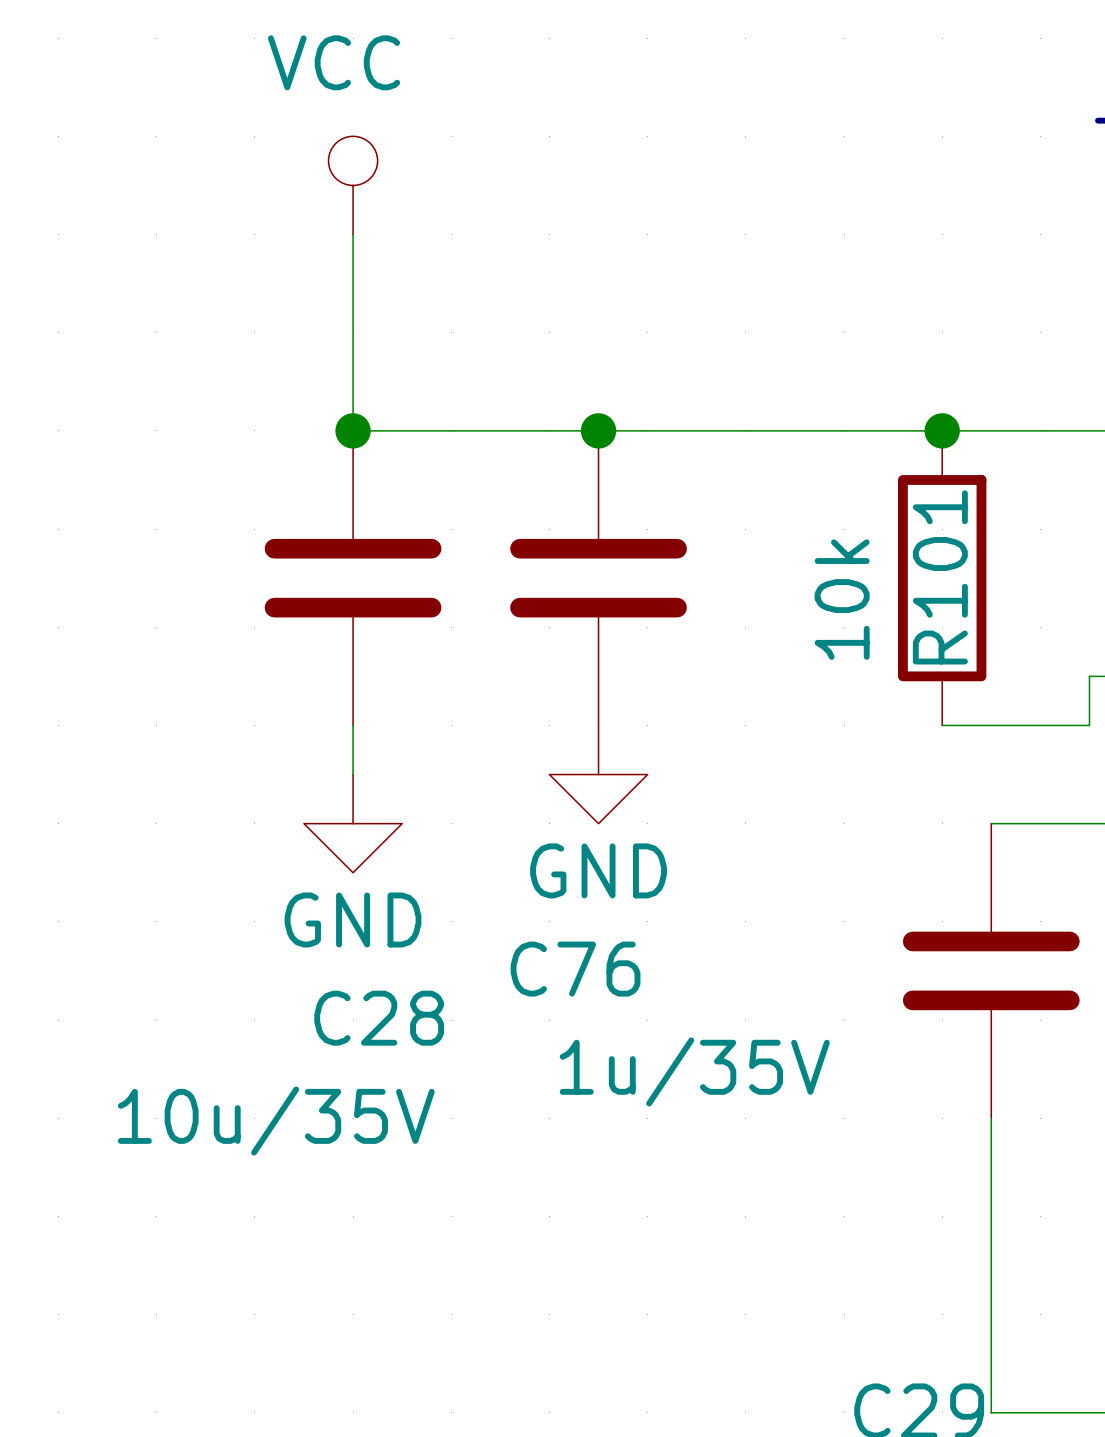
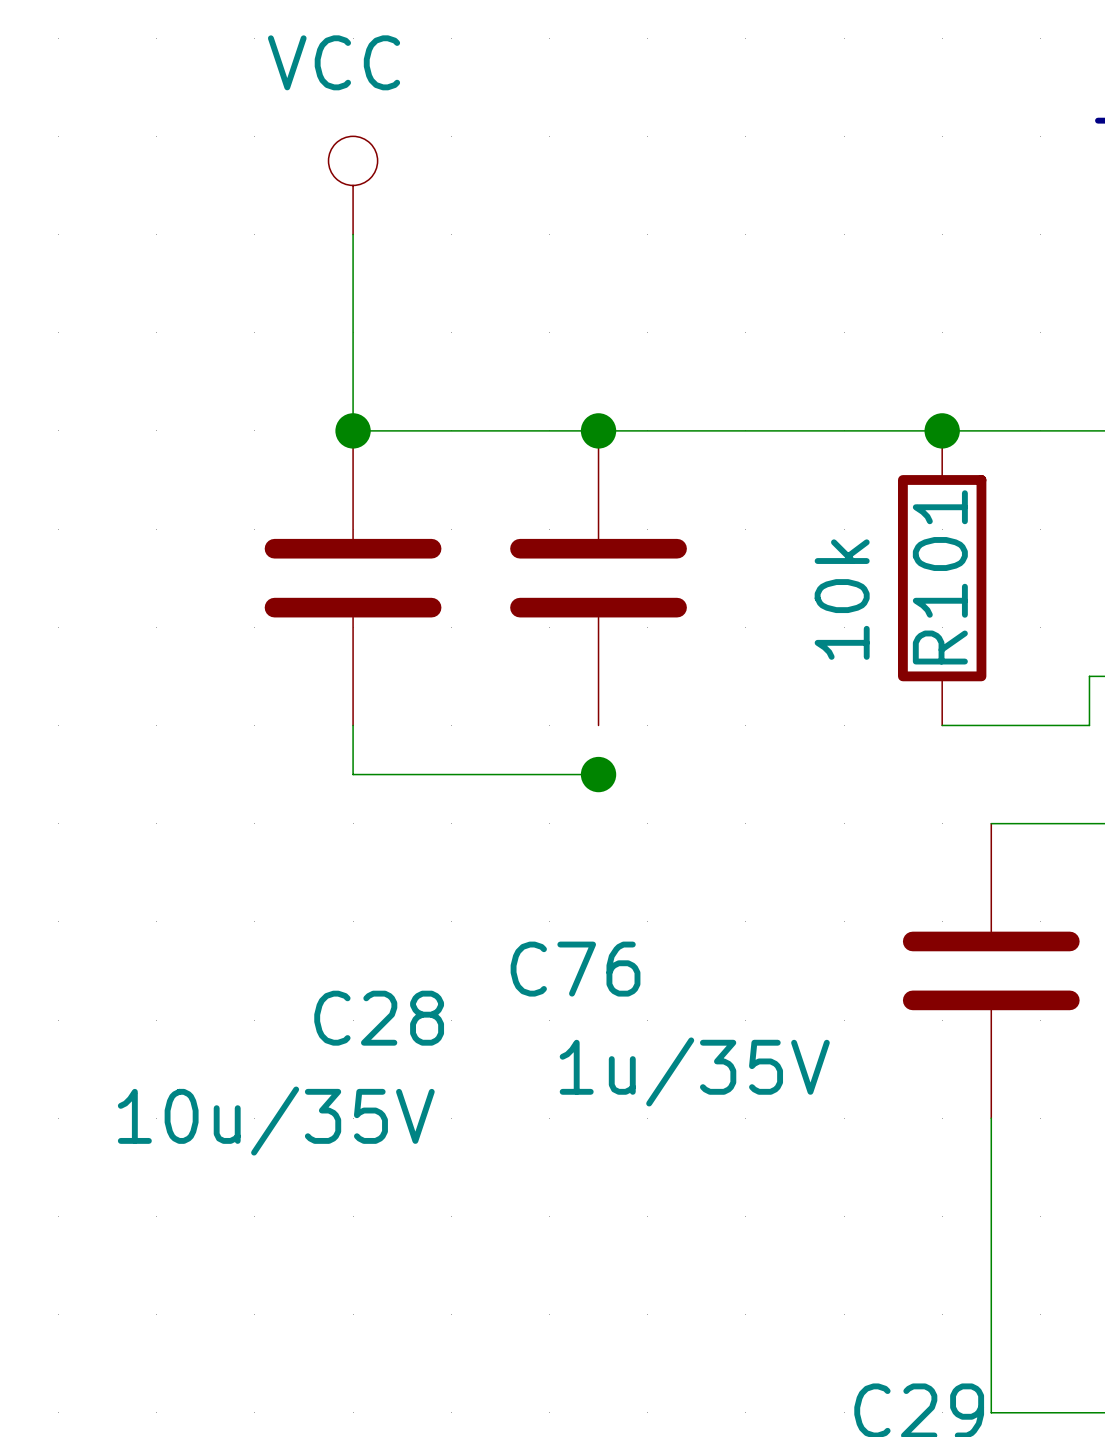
wire: none -> (353, 774) (598, 774)
power symbol: GND (598, 774) -> none
junction: none -> (598, 774)
power symbol: GND (353, 823) -> none

